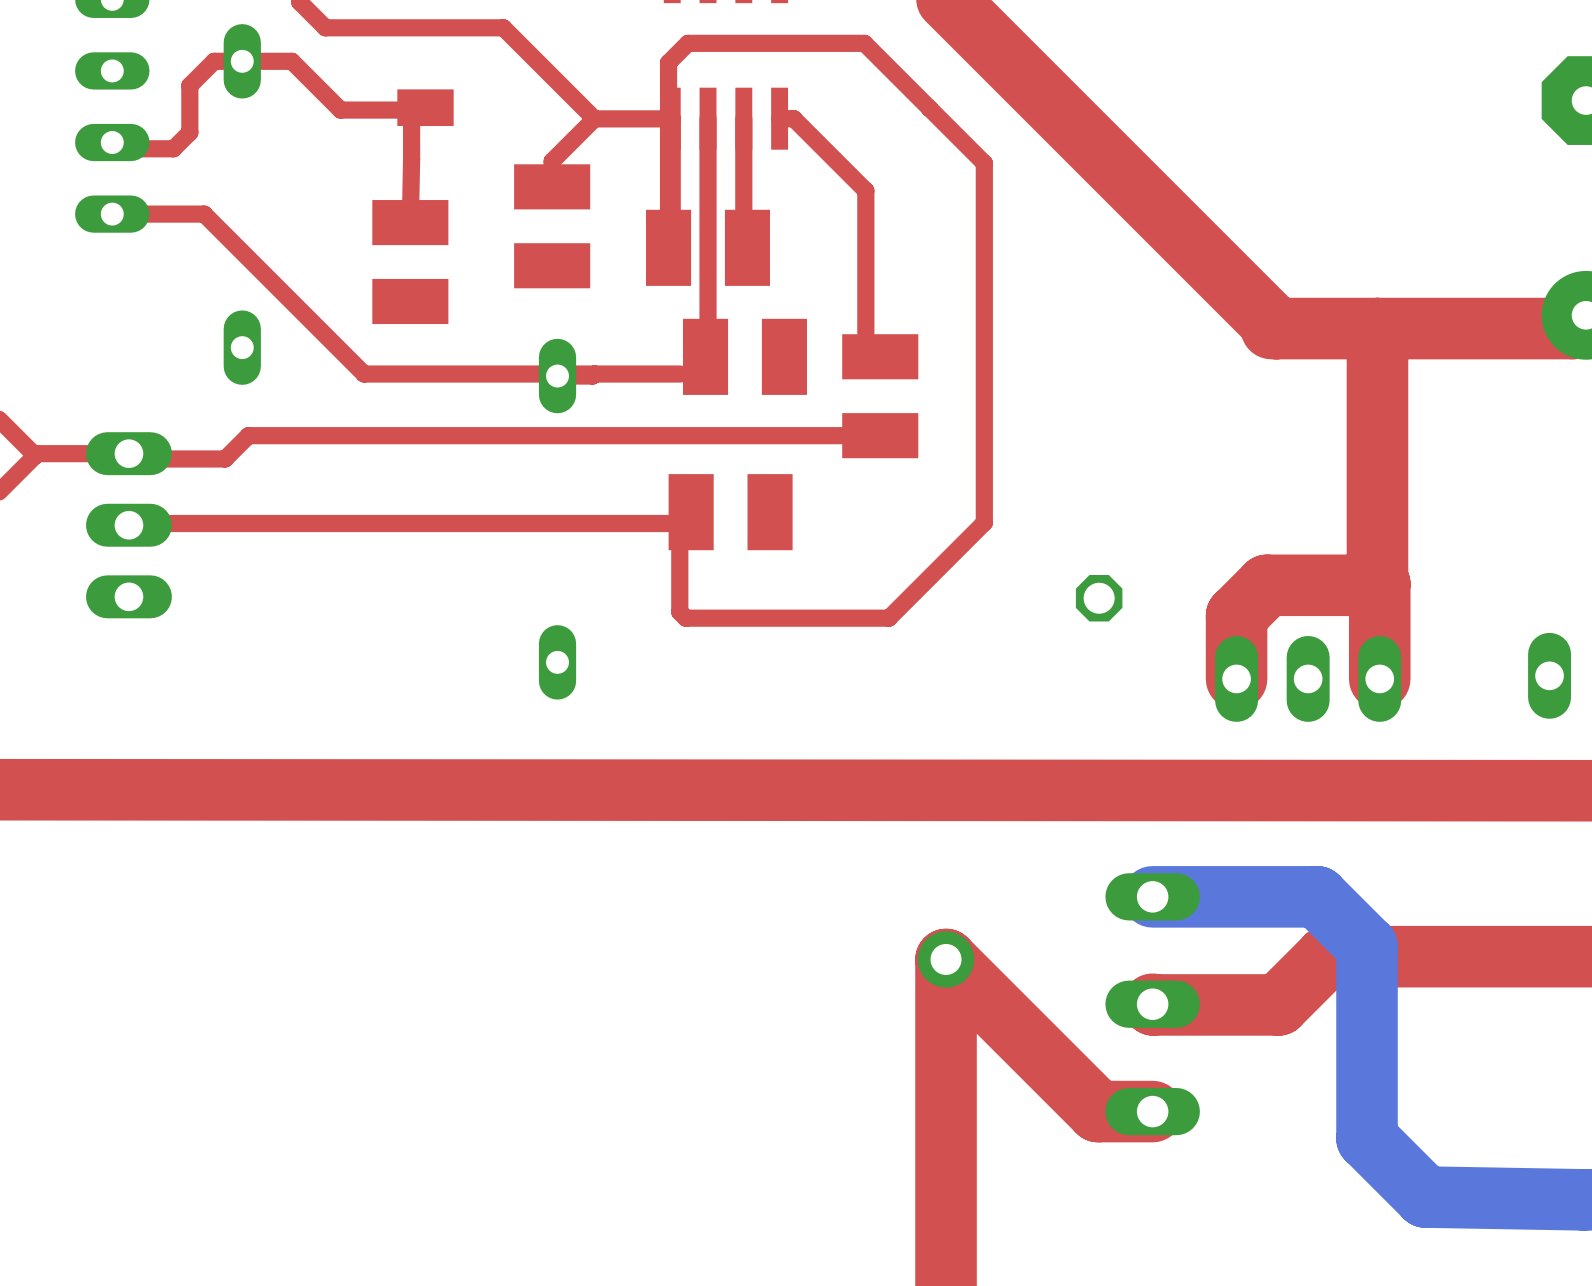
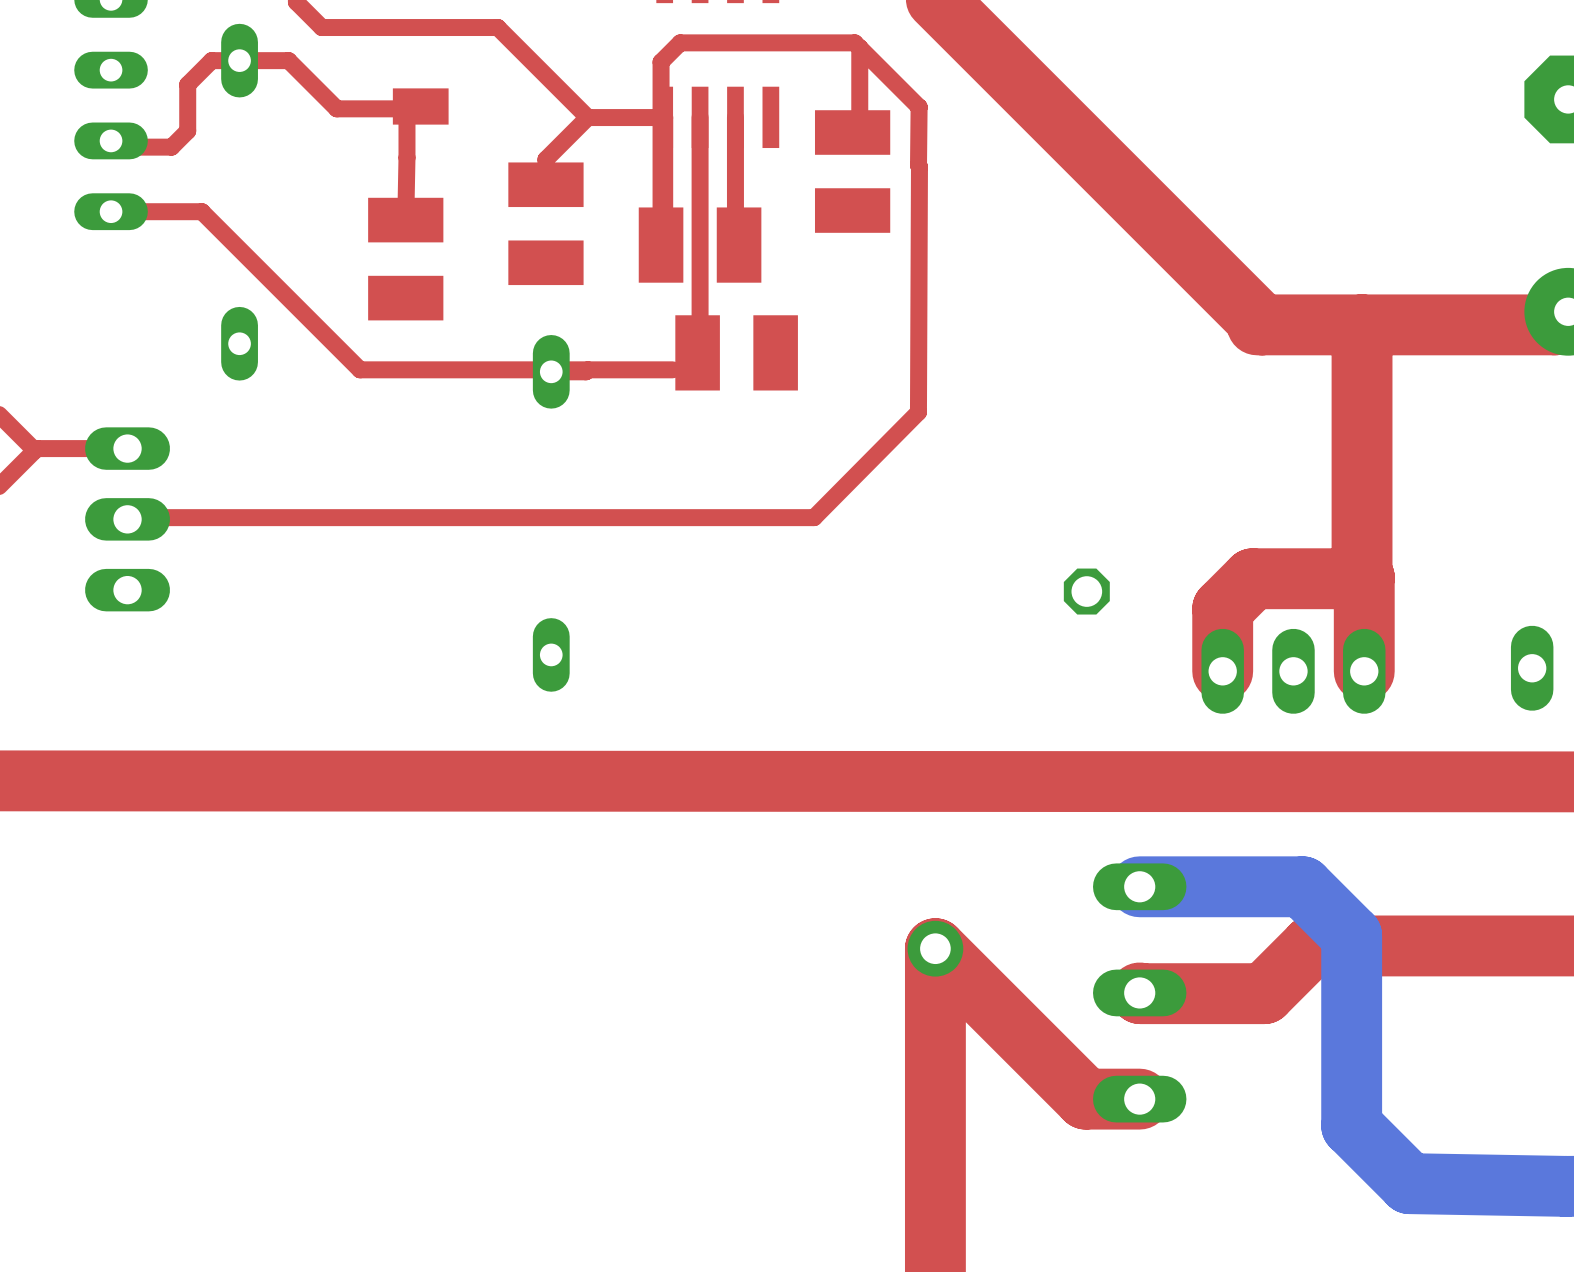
top track: none -> (859, 47) (859, 132) (852, 132)
top track: (929, 108) (984, 163) (984, 522) (888, 618) (685, 618) (679, 612) (679, 523) (691, 512) -> (919, 107) (918, 412) (814, 517) (672, 517)
top track: (779, 118) (793, 118) (865, 190) (865, 342) (880, 356) -> none
part: none -> (852, 171)
part: (880, 396) -> none
top track: (880, 435) (248, 435) (225, 458) (134, 458) (128, 453) -> none
part: (730, 512) -> none

